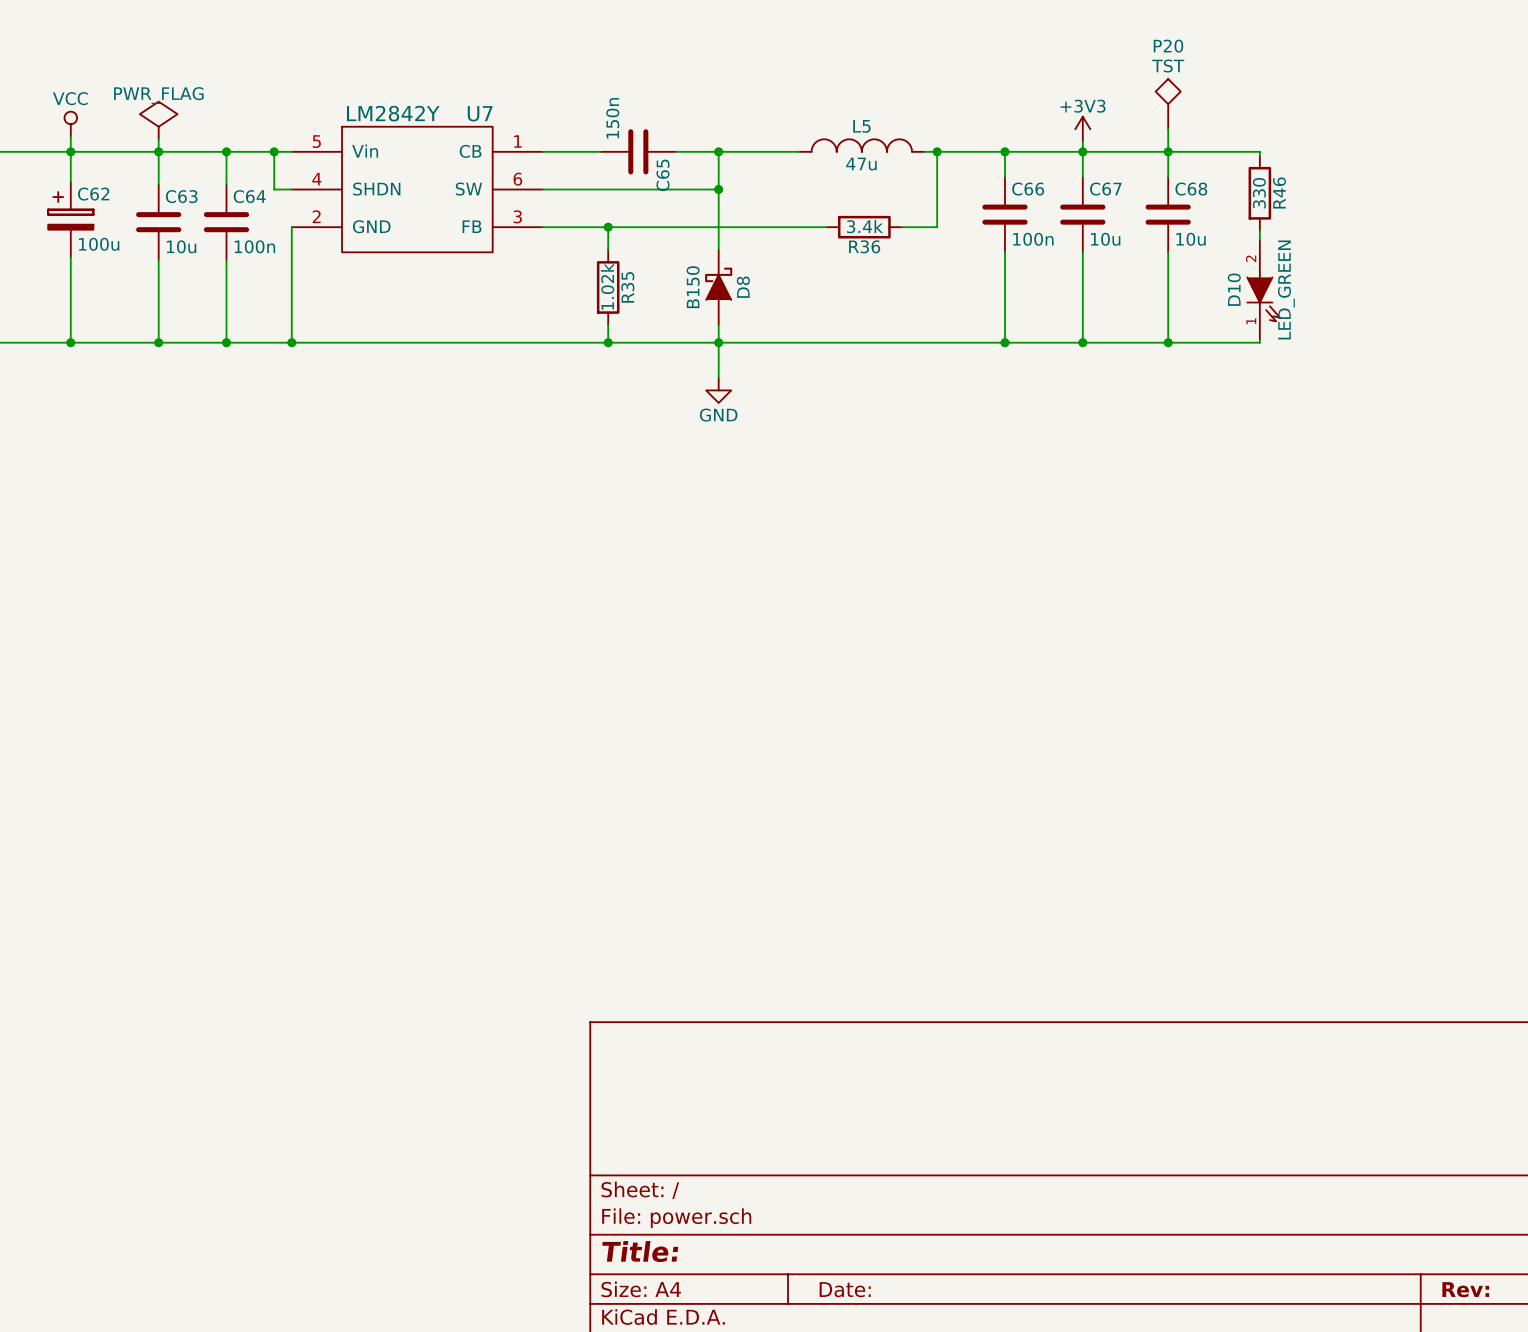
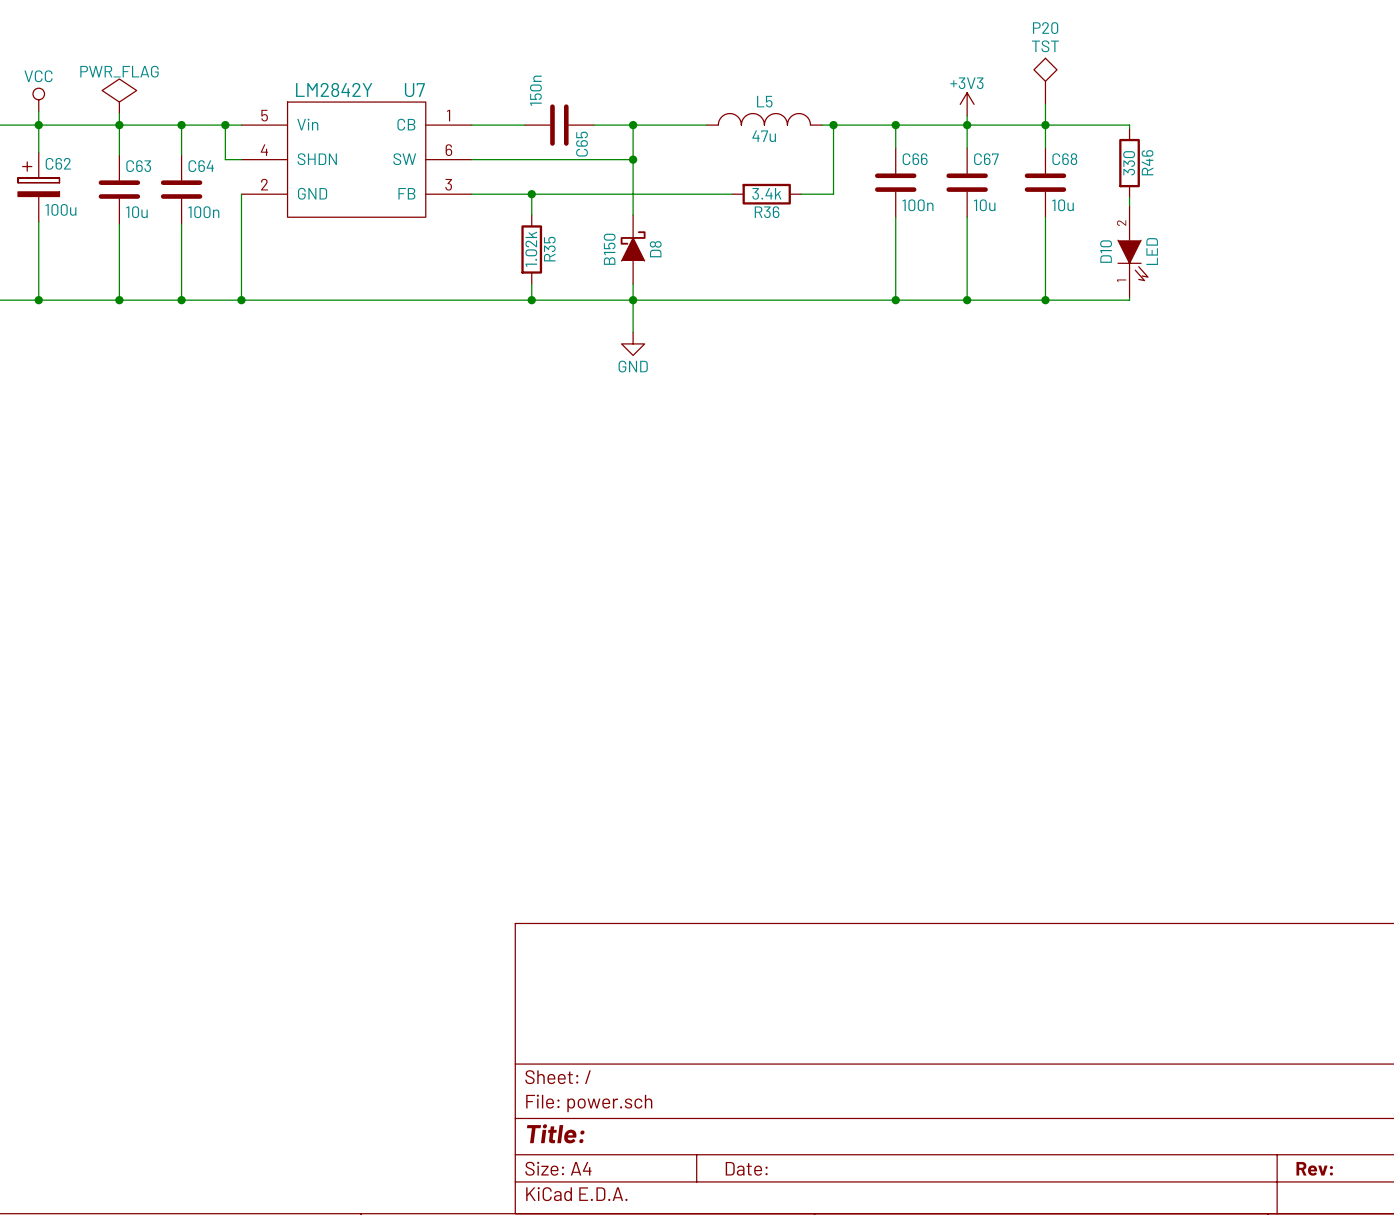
D10 value: LED_GREEN (1286, 289) -> LED (1152, 251)

